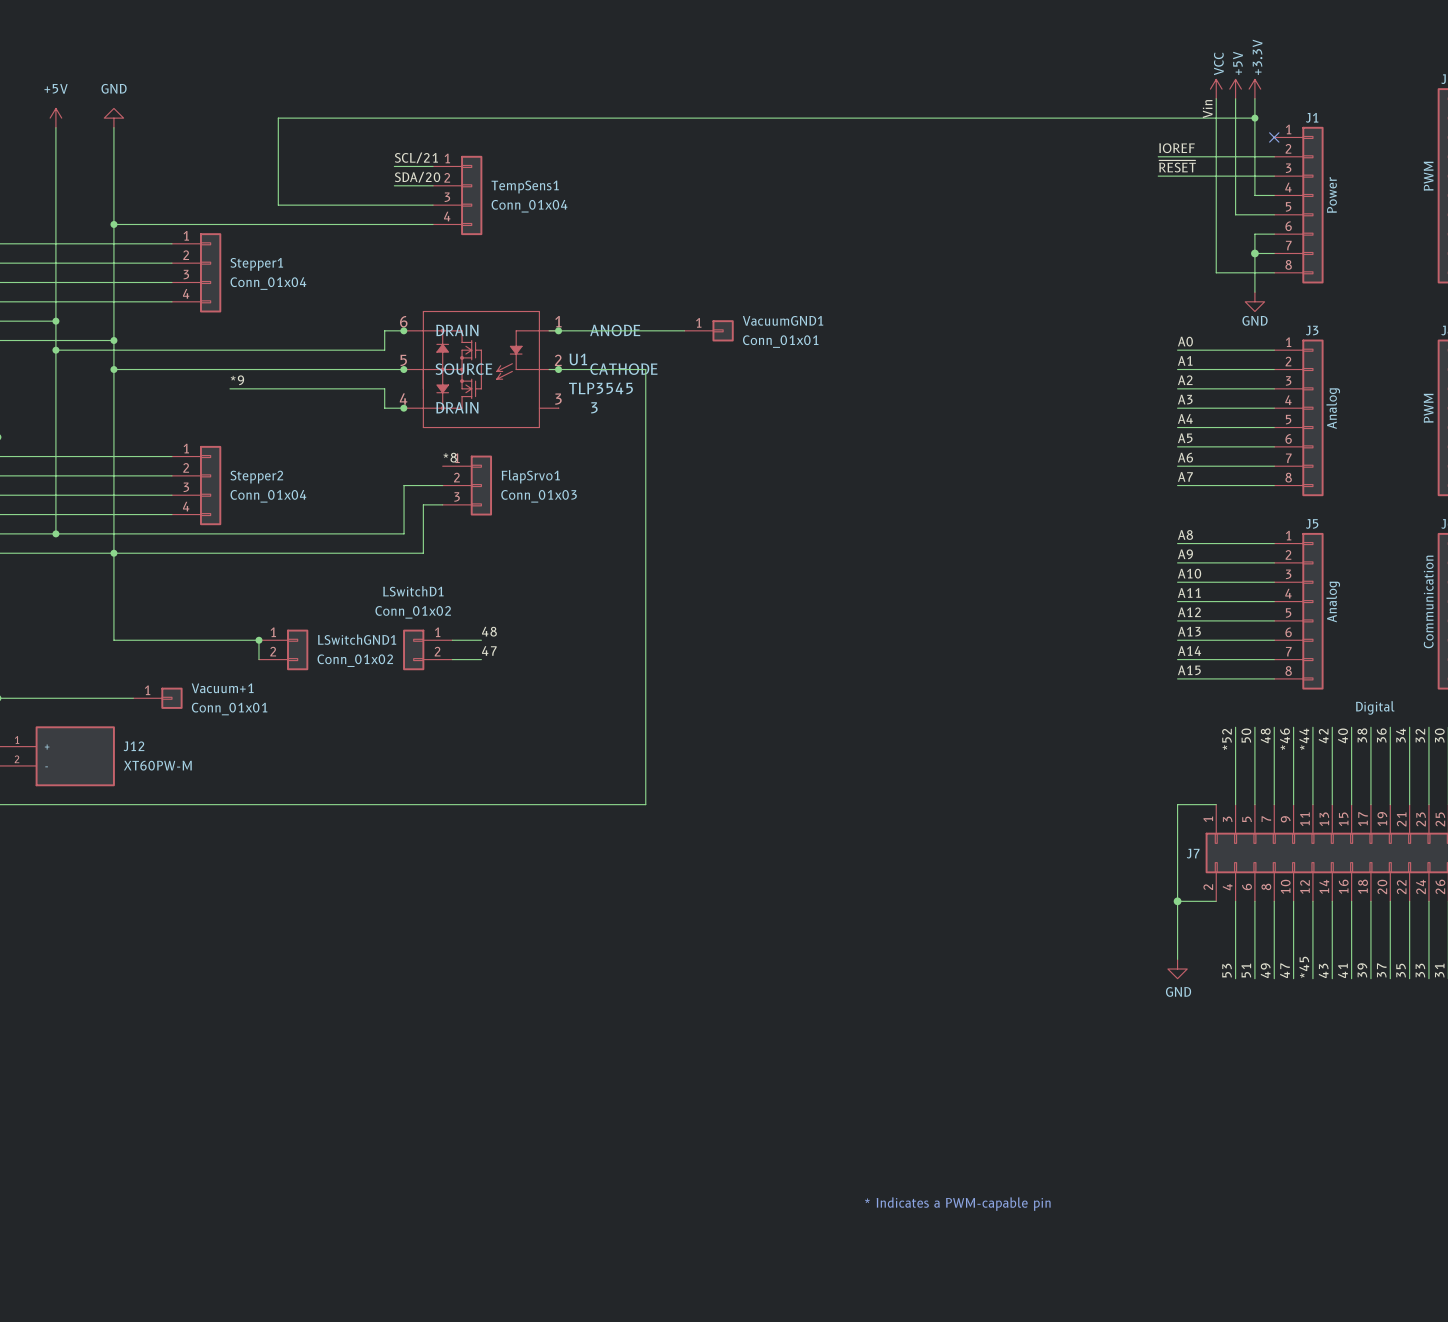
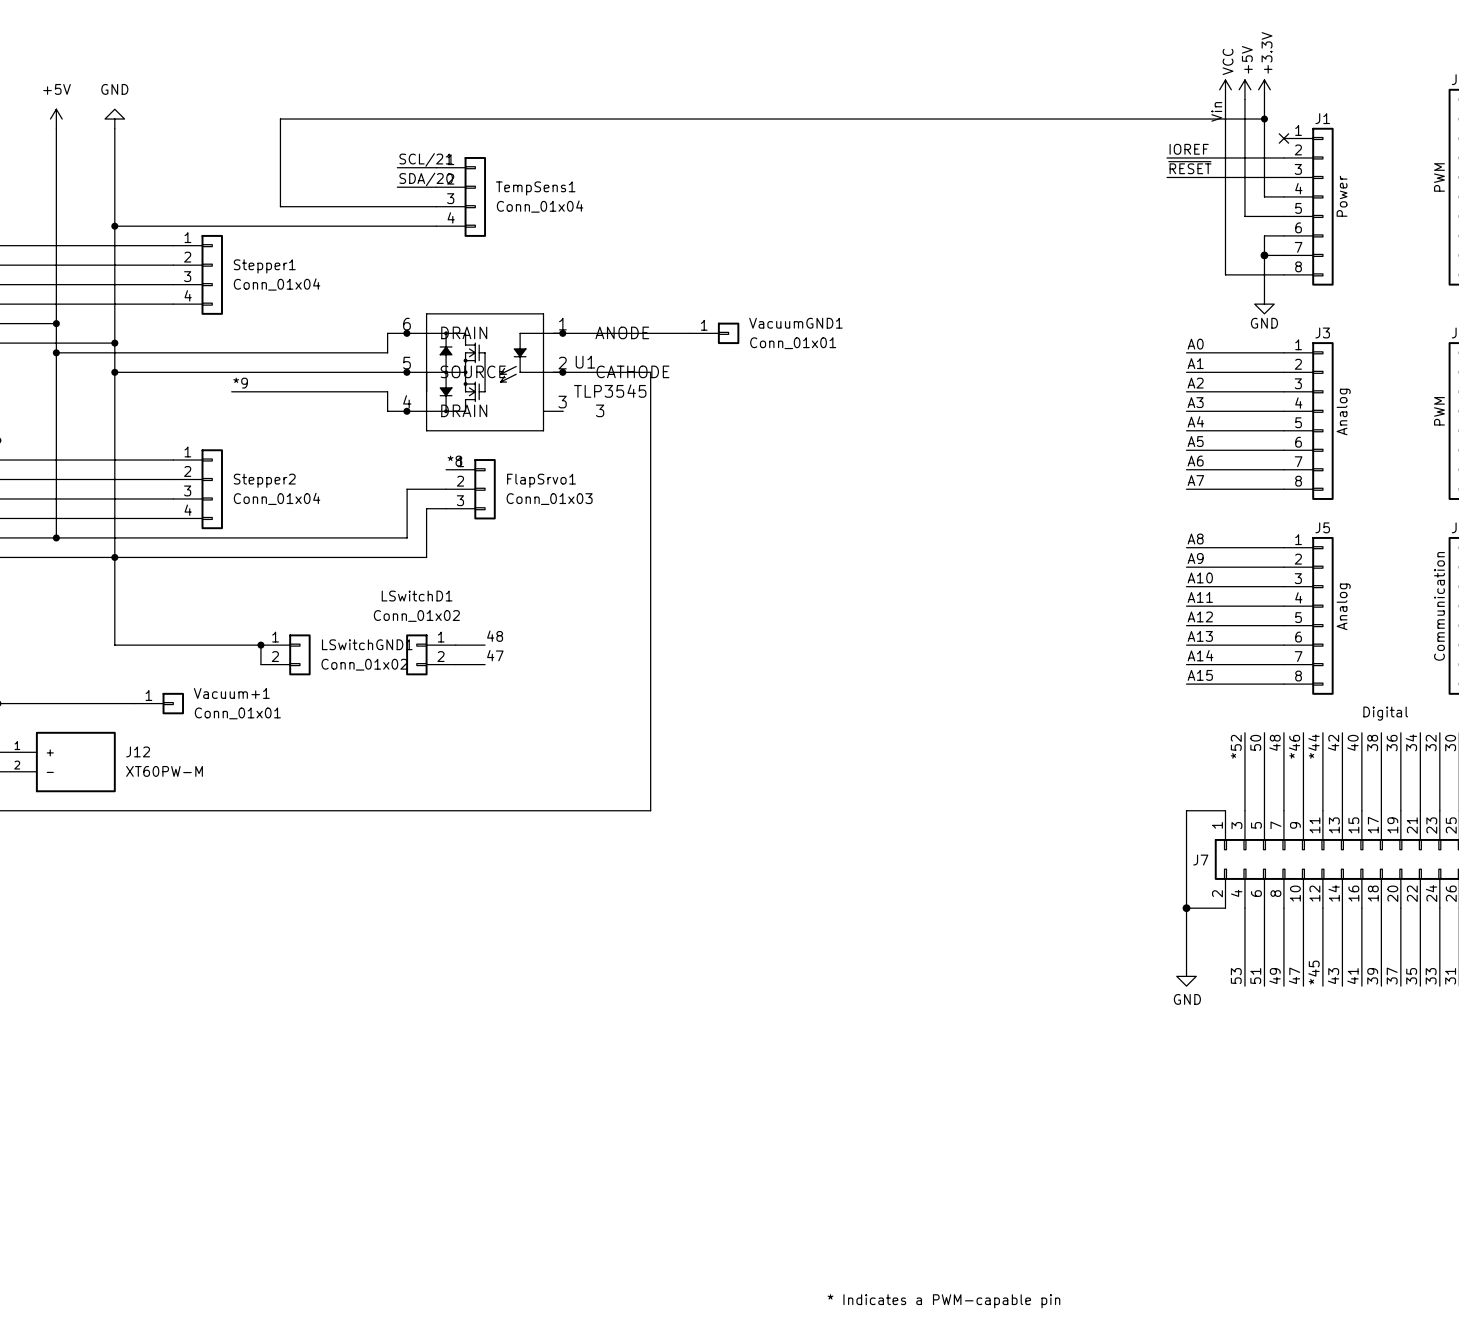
text: * Indicates a PWM-capable pin (957, 1204) -> none
text: none -> * Indicates a PWM-capable pin (943, 1301)

